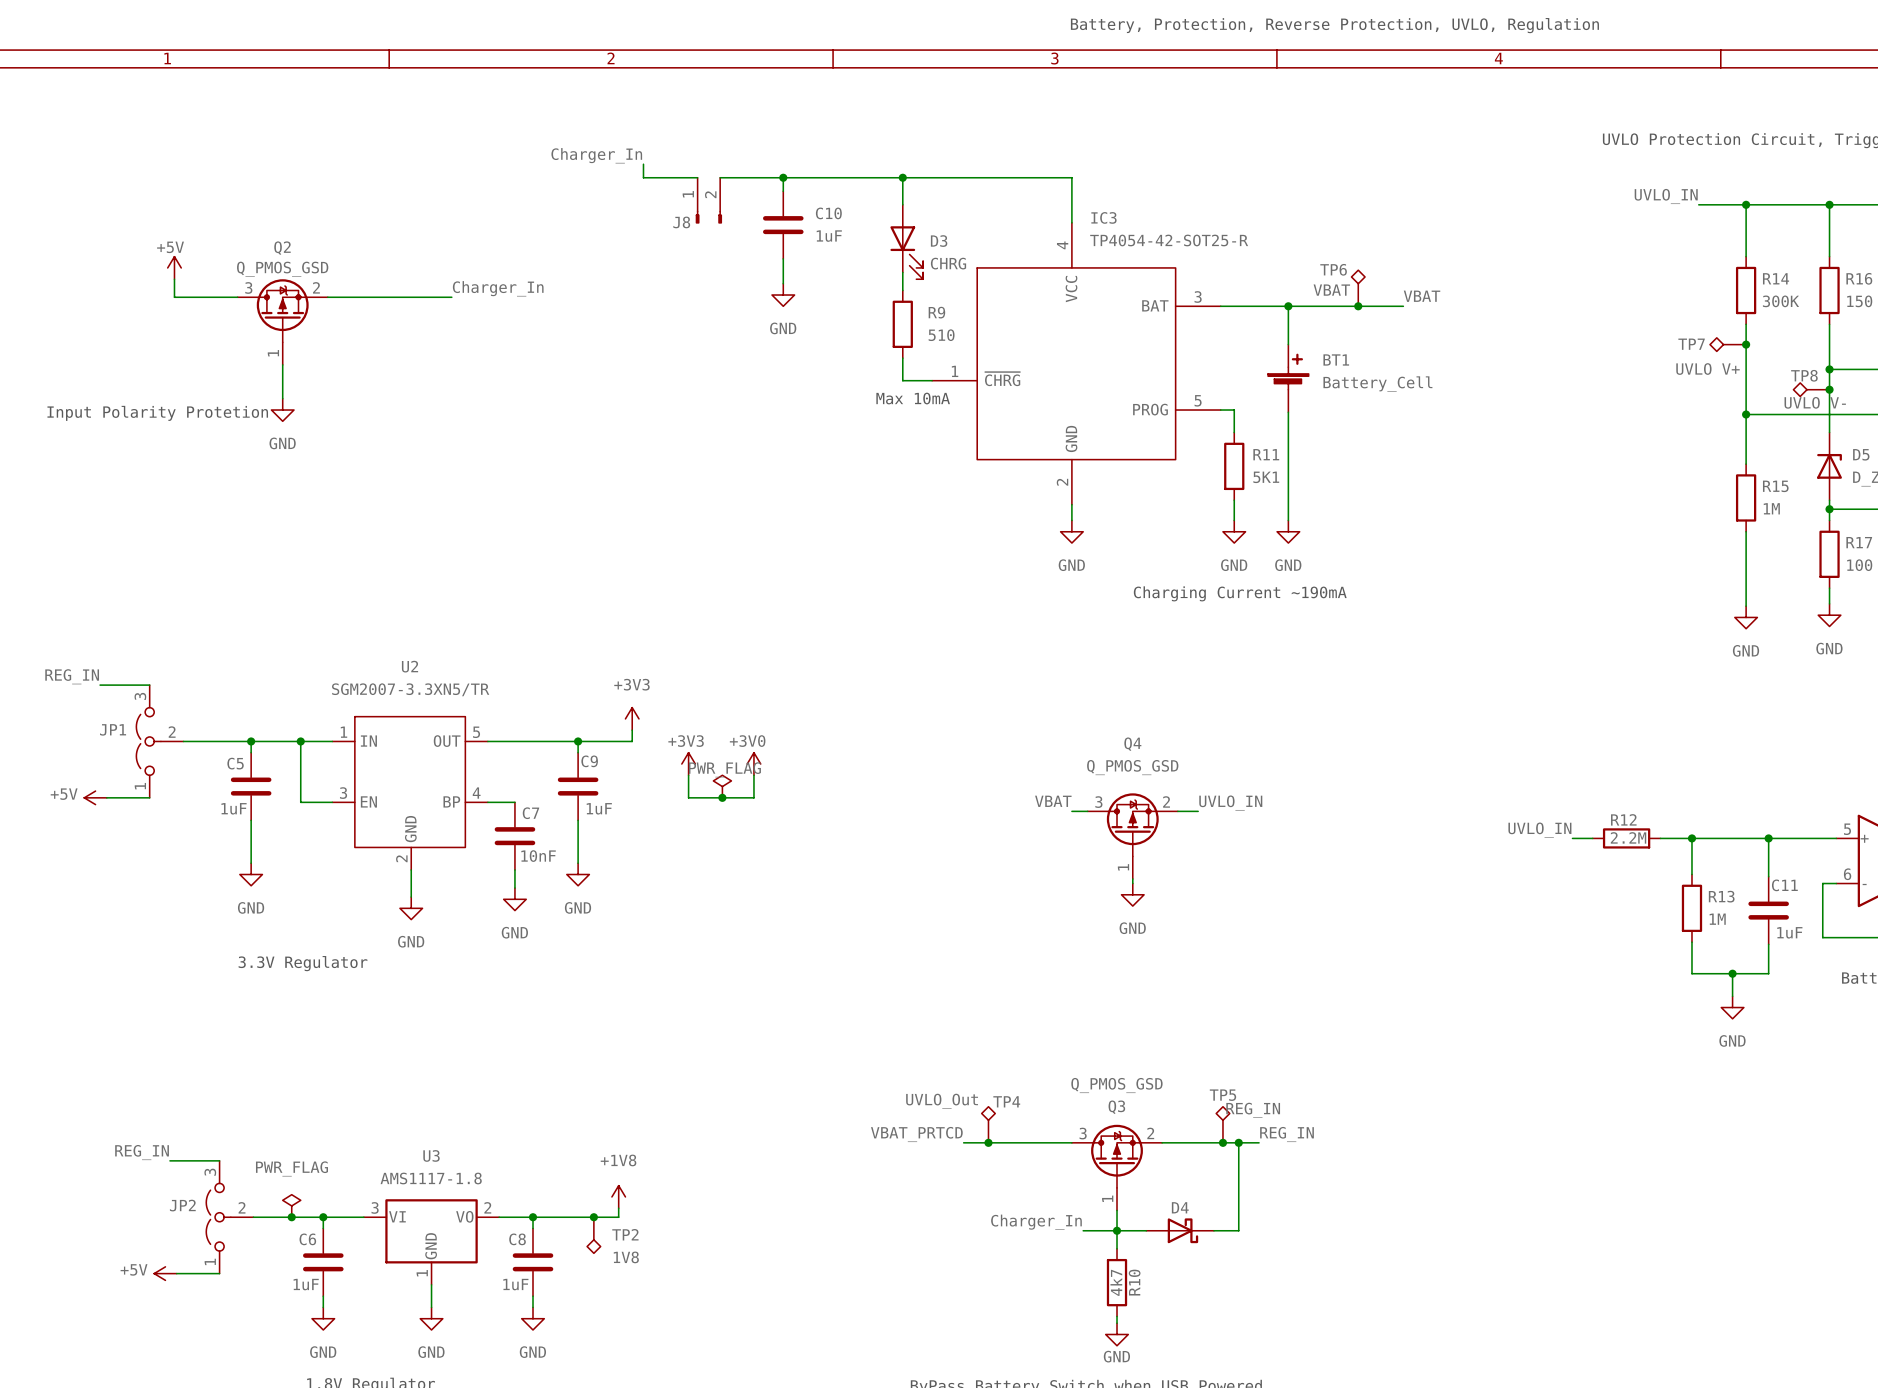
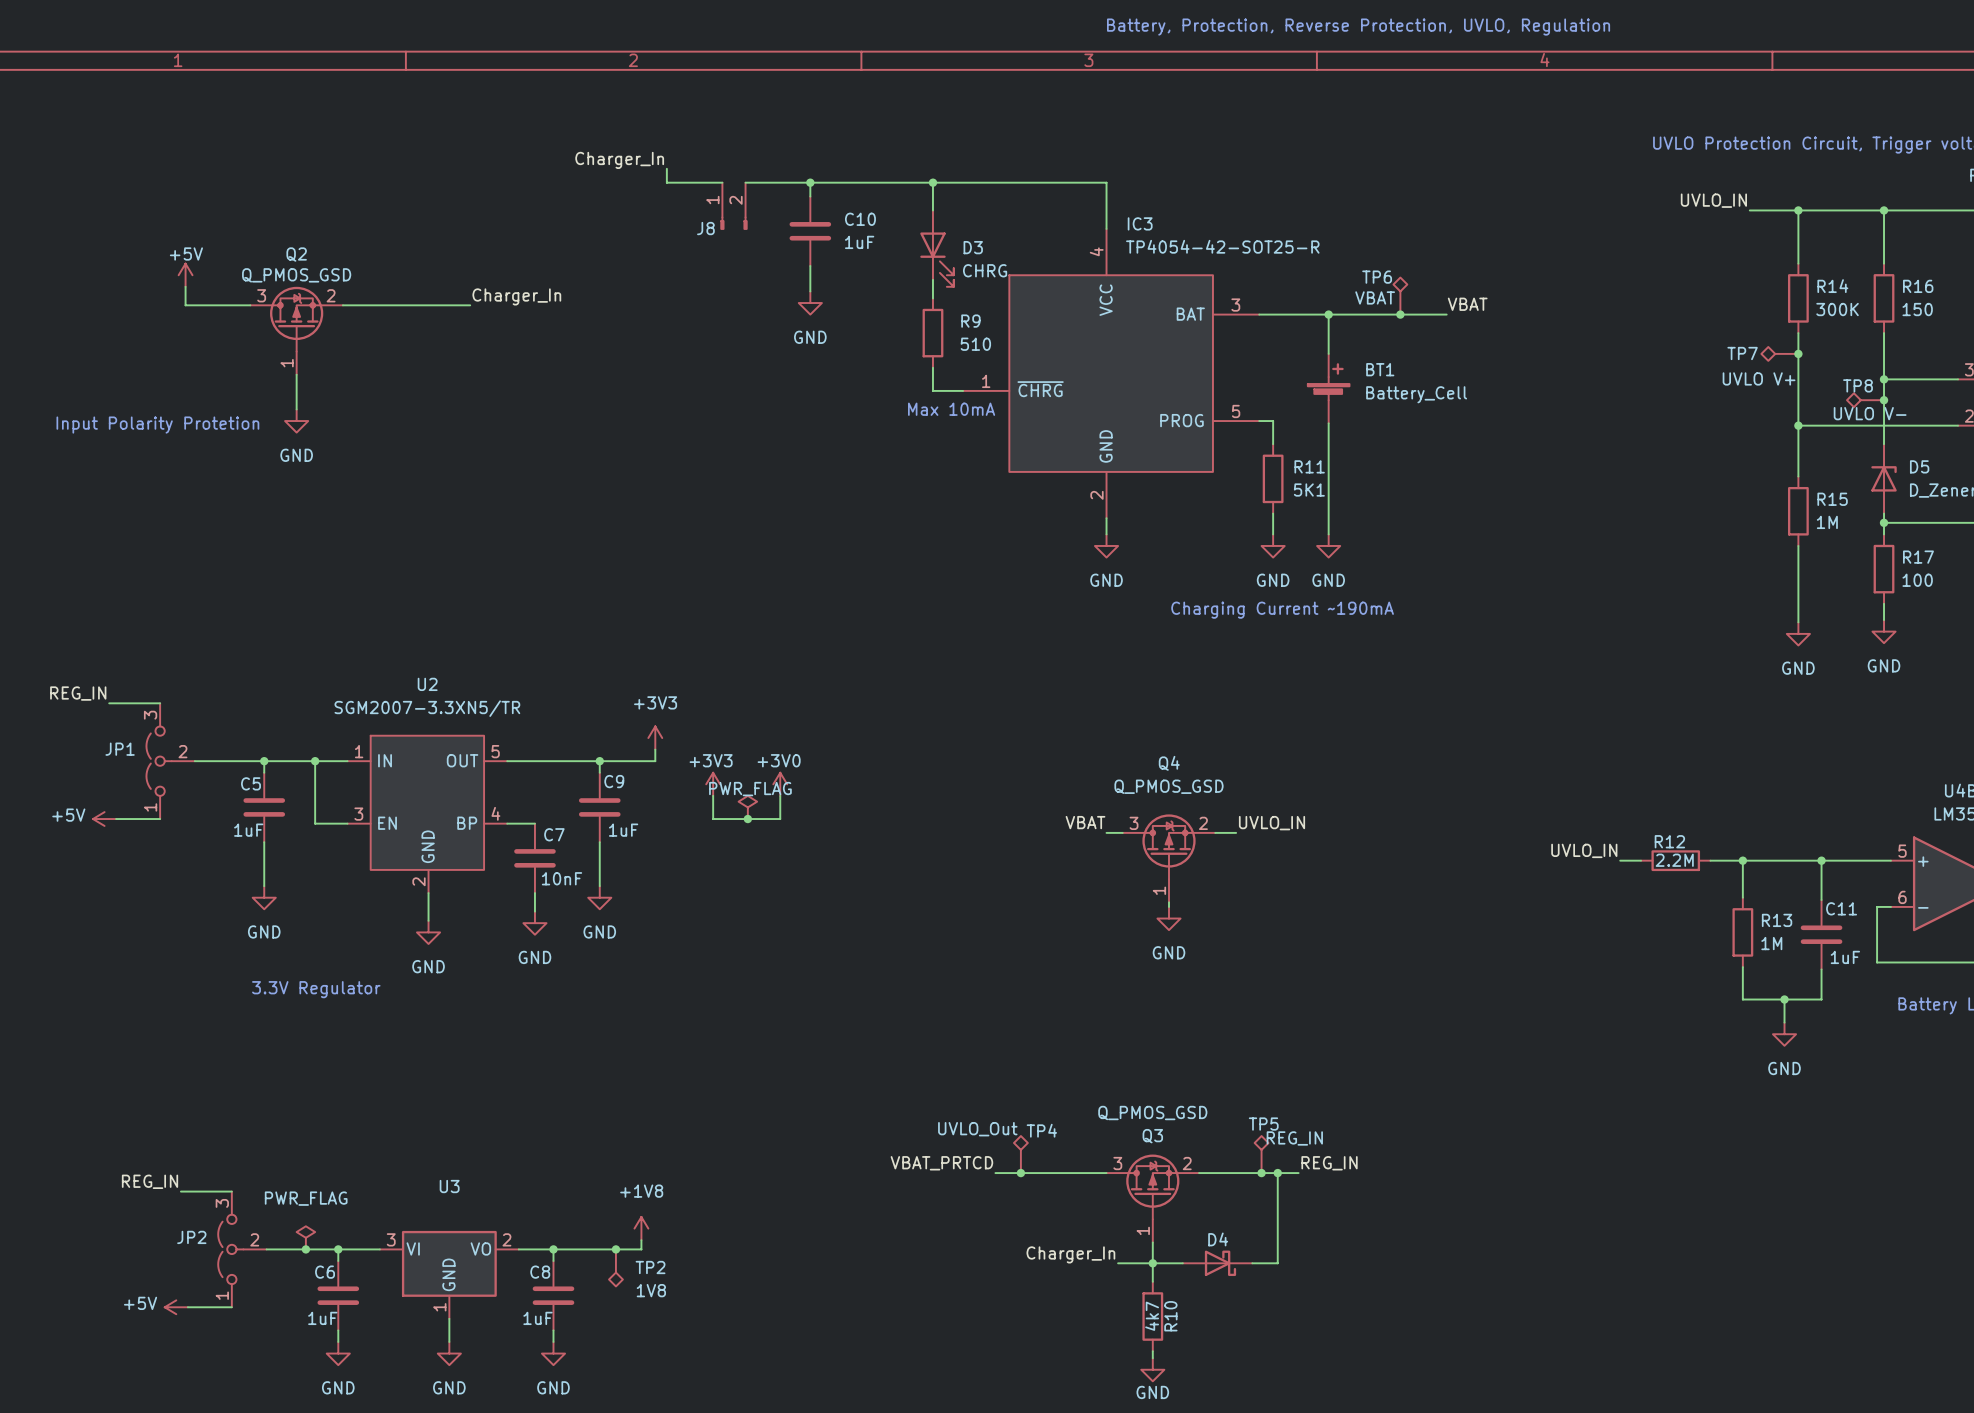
U3 value: AMS1117-1.8 (431, 1178) -> none

